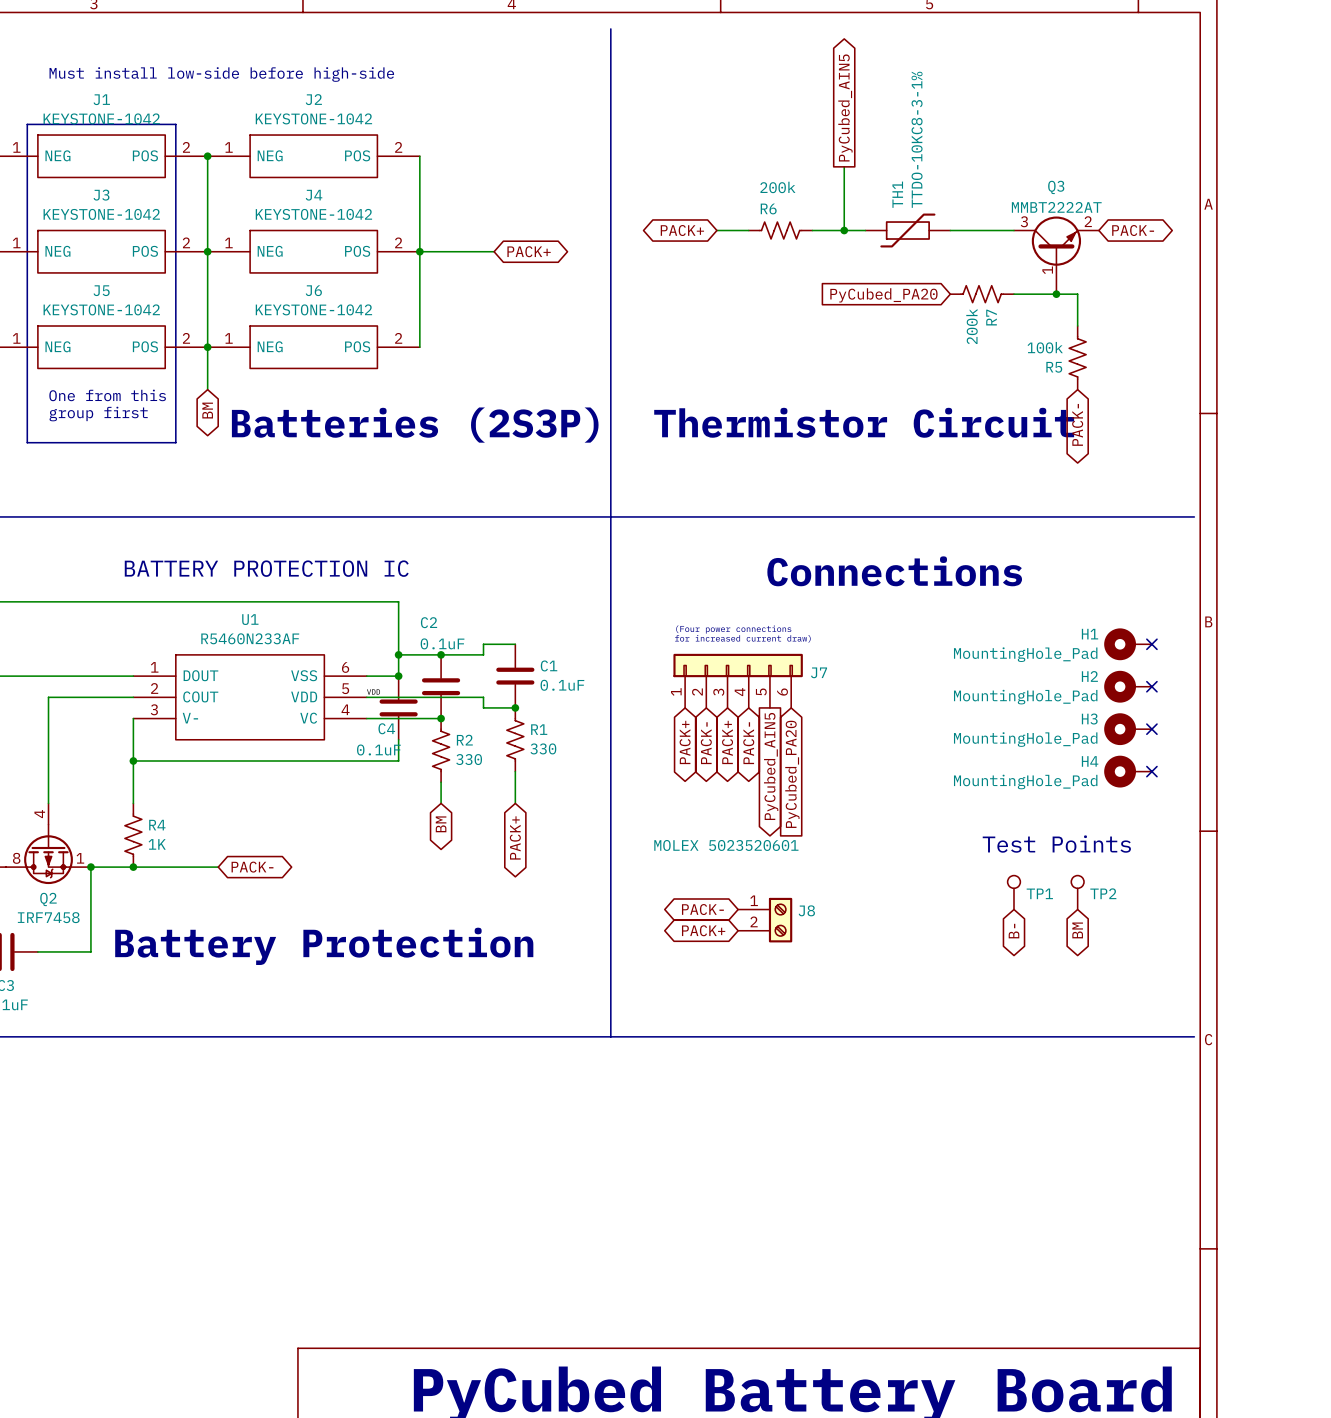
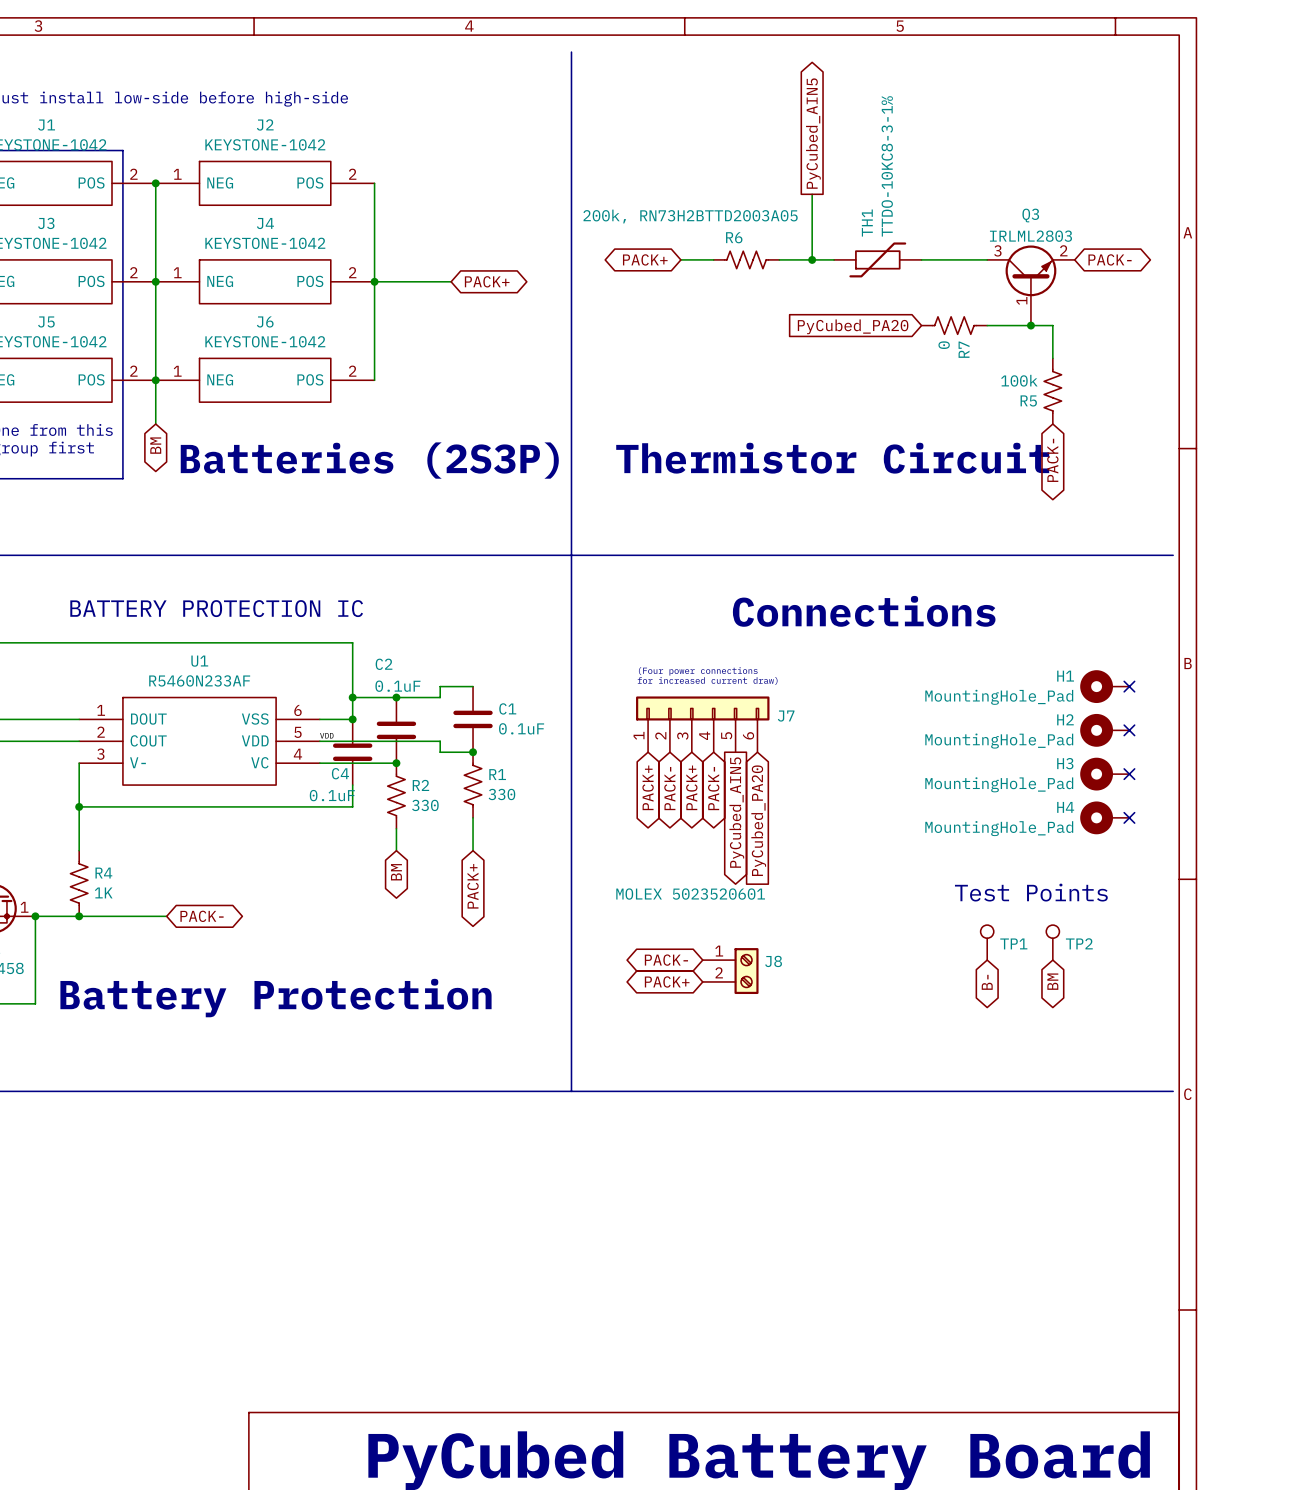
R6 value: 200k (777, 187) -> 200k, RN73H2BTTD2003A05 (690, 216)
Q3 value: MMBT2222AT (1056, 207) -> IRLML2803 (1030, 236)
R7 value: 200k (971, 326) -> 0 (944, 345)

